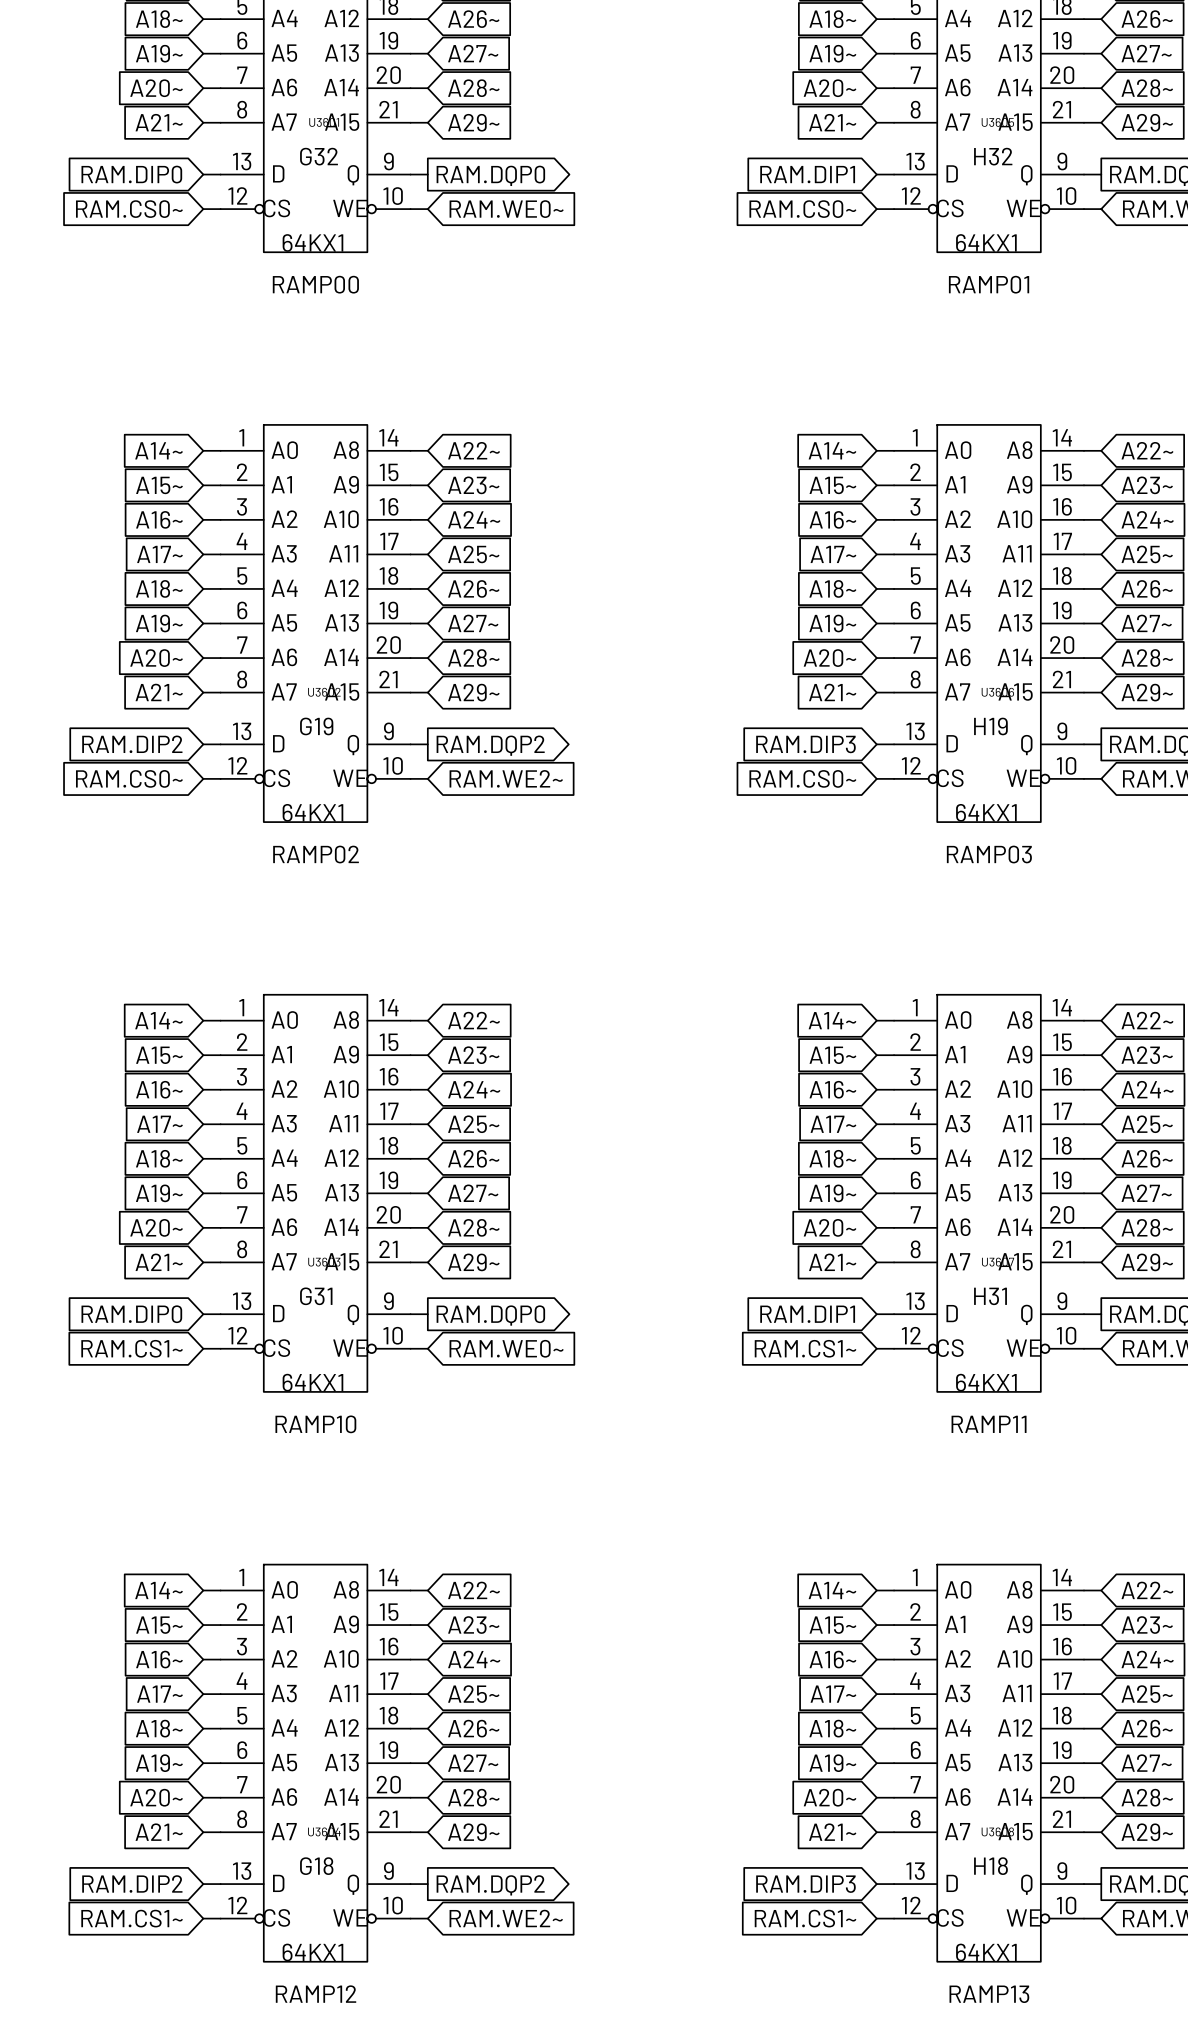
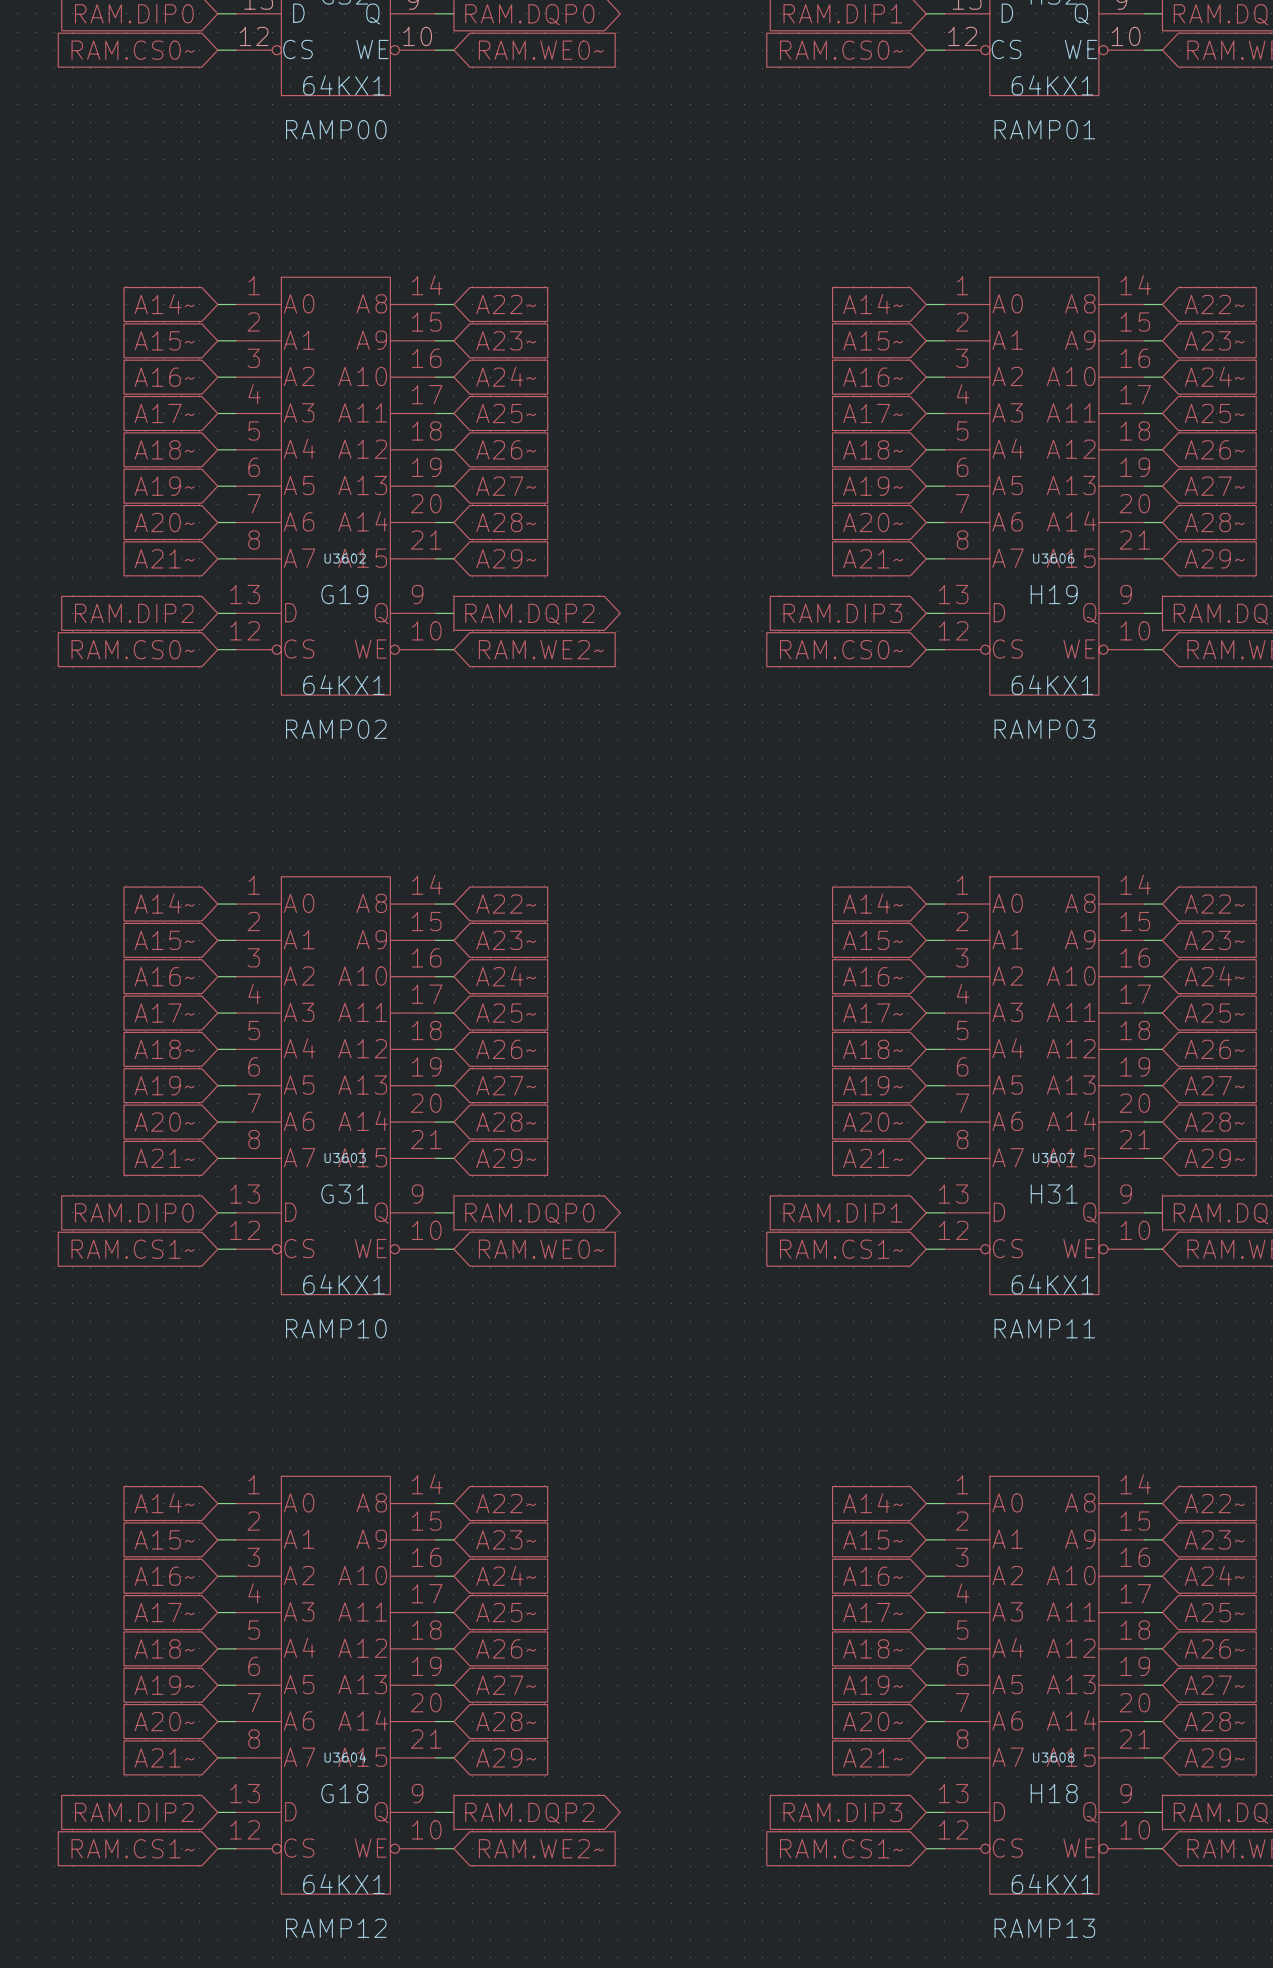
U3602 symbol: [220, 424, 411, 823] -> [235, 277, 436, 696]
U3606 symbol: [894, 424, 1085, 823] -> [944, 277, 1145, 696]
U3603 symbol: [220, 994, 411, 1392] -> [235, 876, 436, 1295]
U3607 symbol: [894, 994, 1085, 1392] -> [944, 876, 1145, 1295]
U3604 symbol: [220, 1564, 411, 1962] -> [235, 1476, 436, 1895]
U3608 symbol: [894, 1564, 1085, 1962] -> [944, 1476, 1145, 1895]

